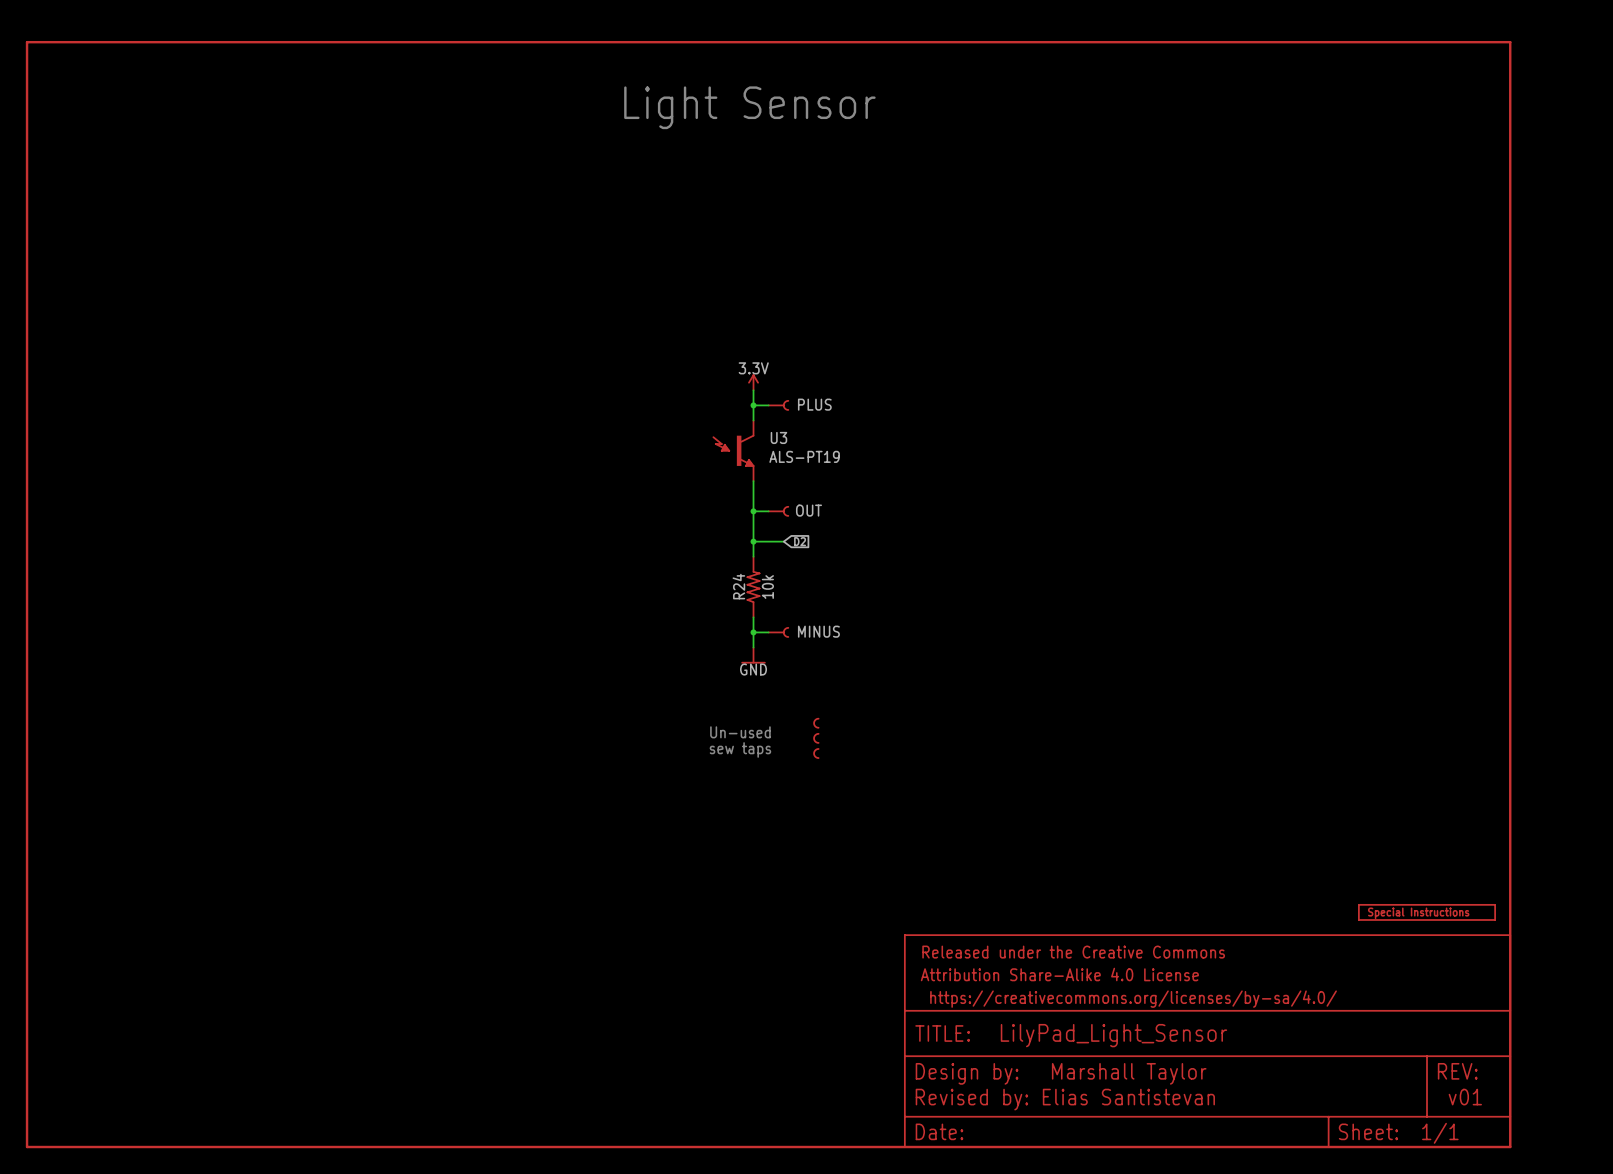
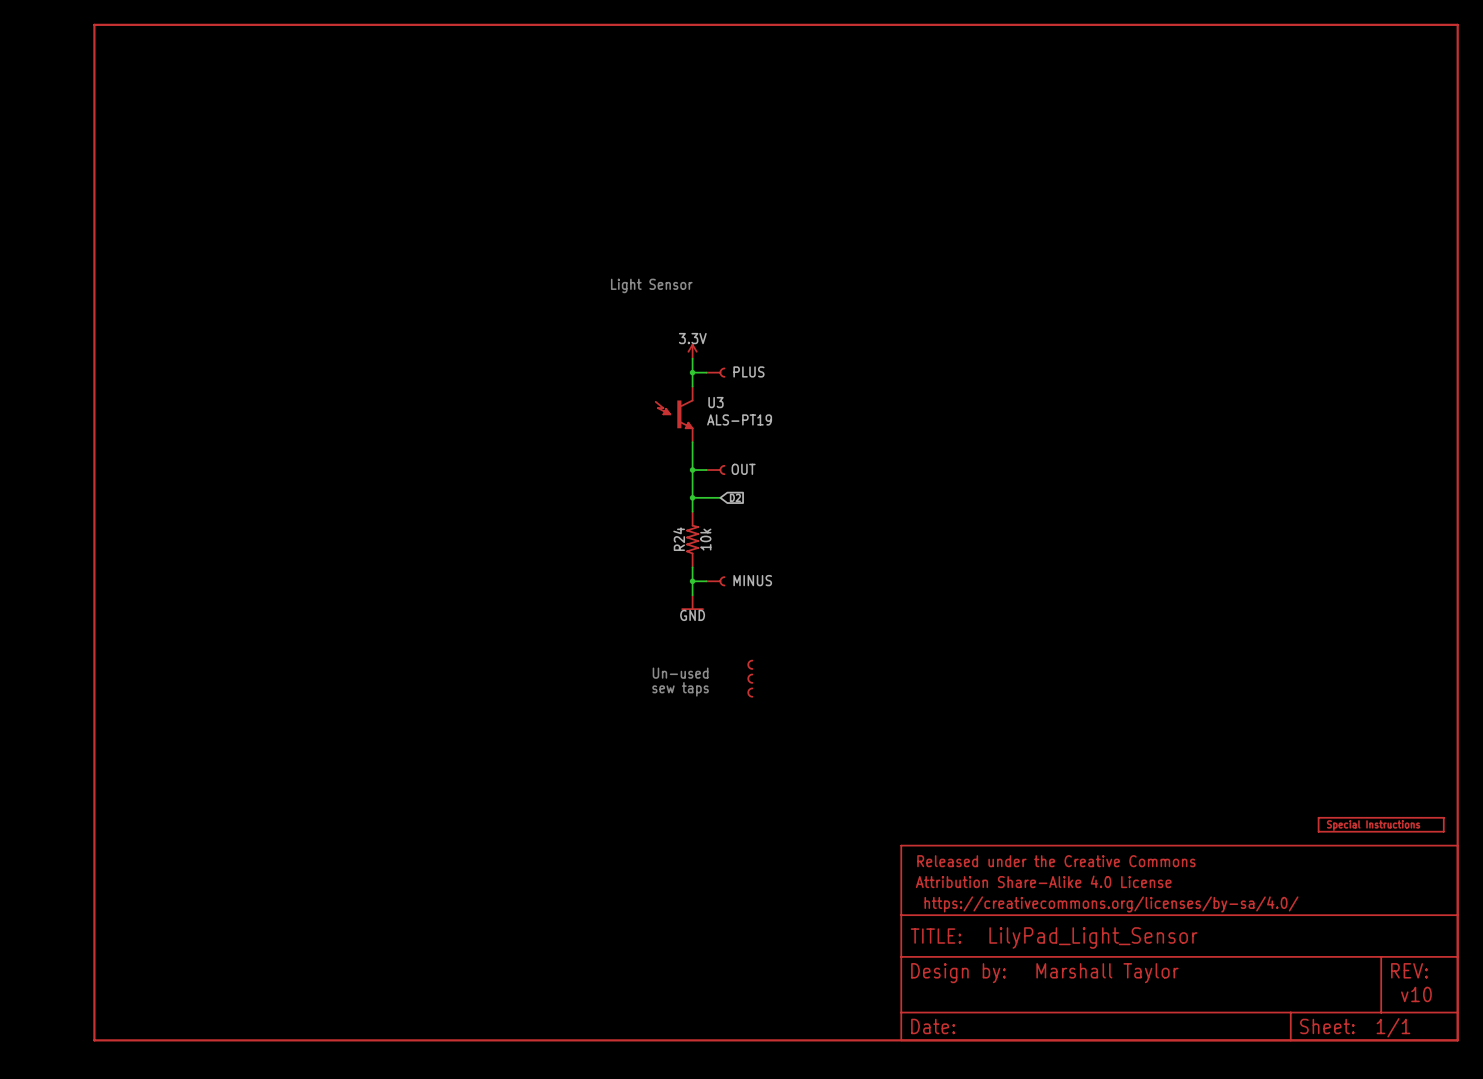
text: Light Sensor (749, 107) -> none
text: none -> Light Sensor (651, 285)
part position: (768, 594) -> (776, 532)
part position: (1427, 912) -> (1381, 824)
part position: (1207, 1041) -> (1179, 942)
text position: Marshall Taylor (1129, 1073) -> Marshall Taylor (1107, 973)
text: none -> v10 (1416, 994)
text: v01 (1465, 1097) -> none
text: Revised by: Elias Santistevan (1065, 1099) -> none

